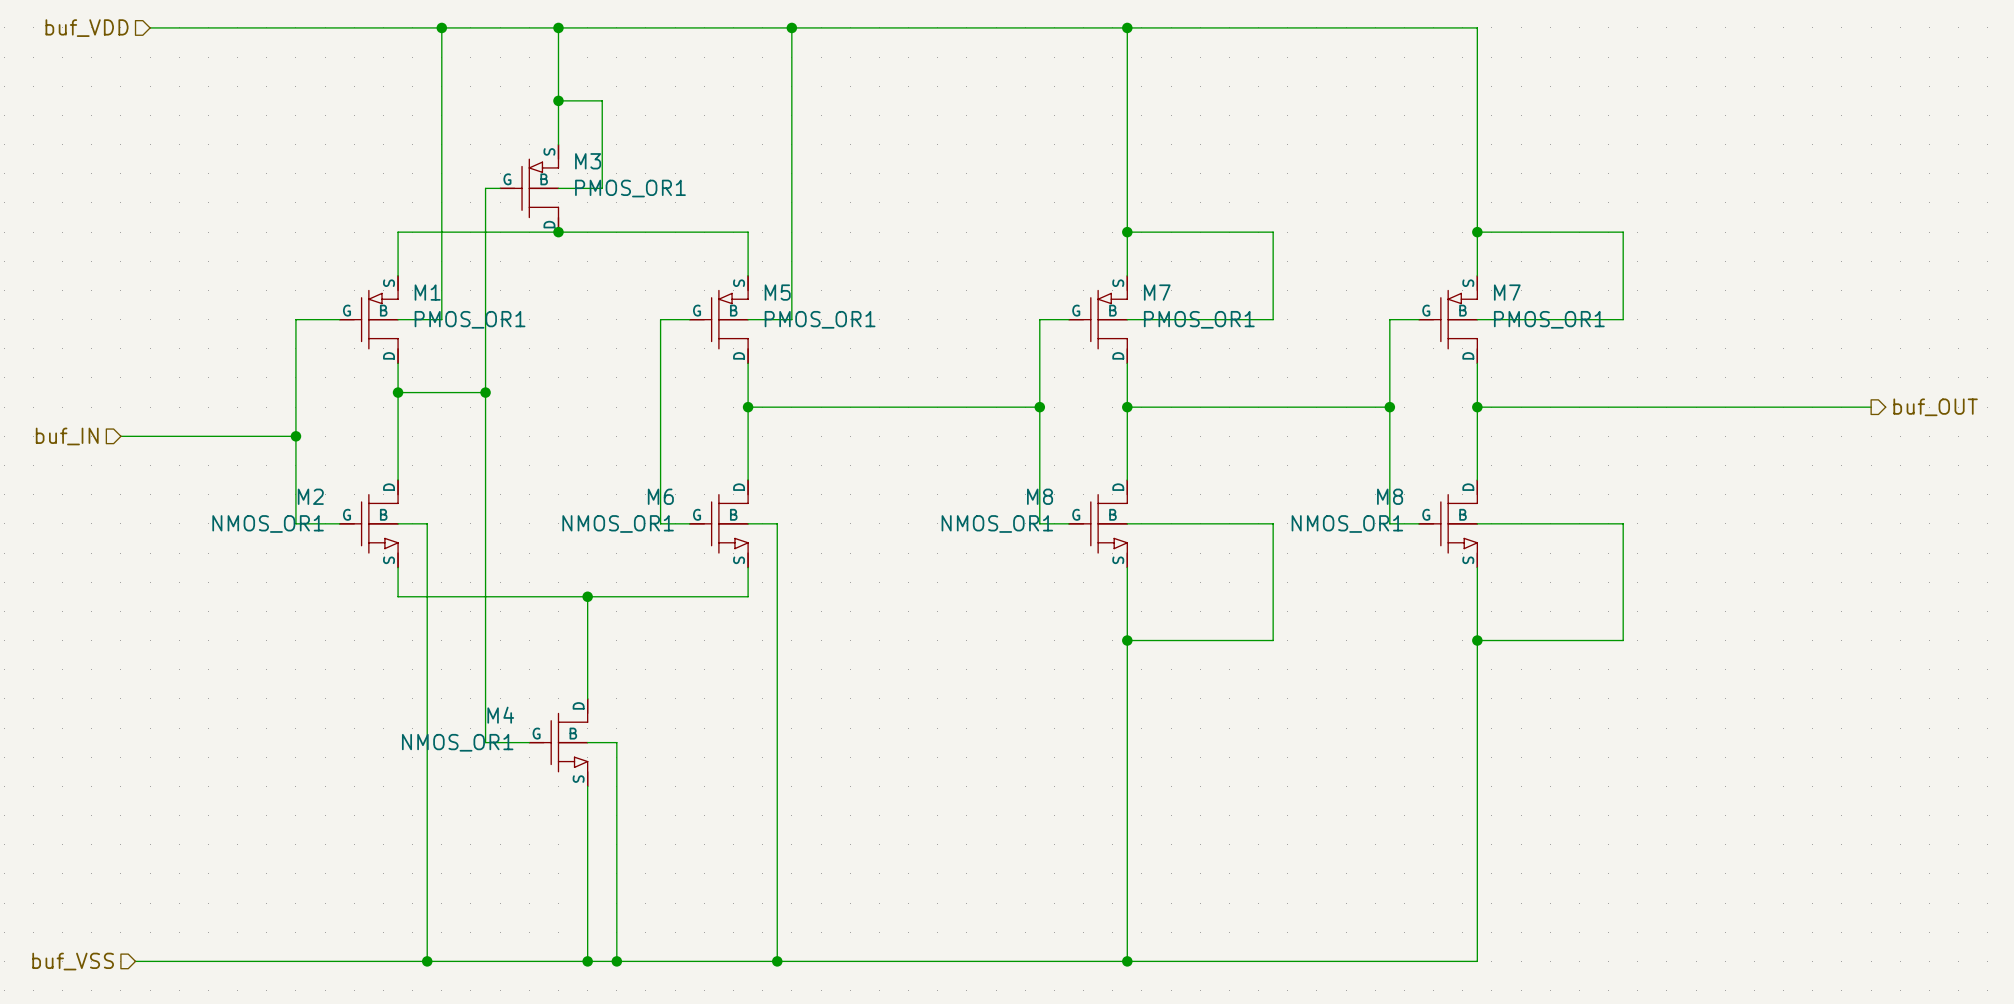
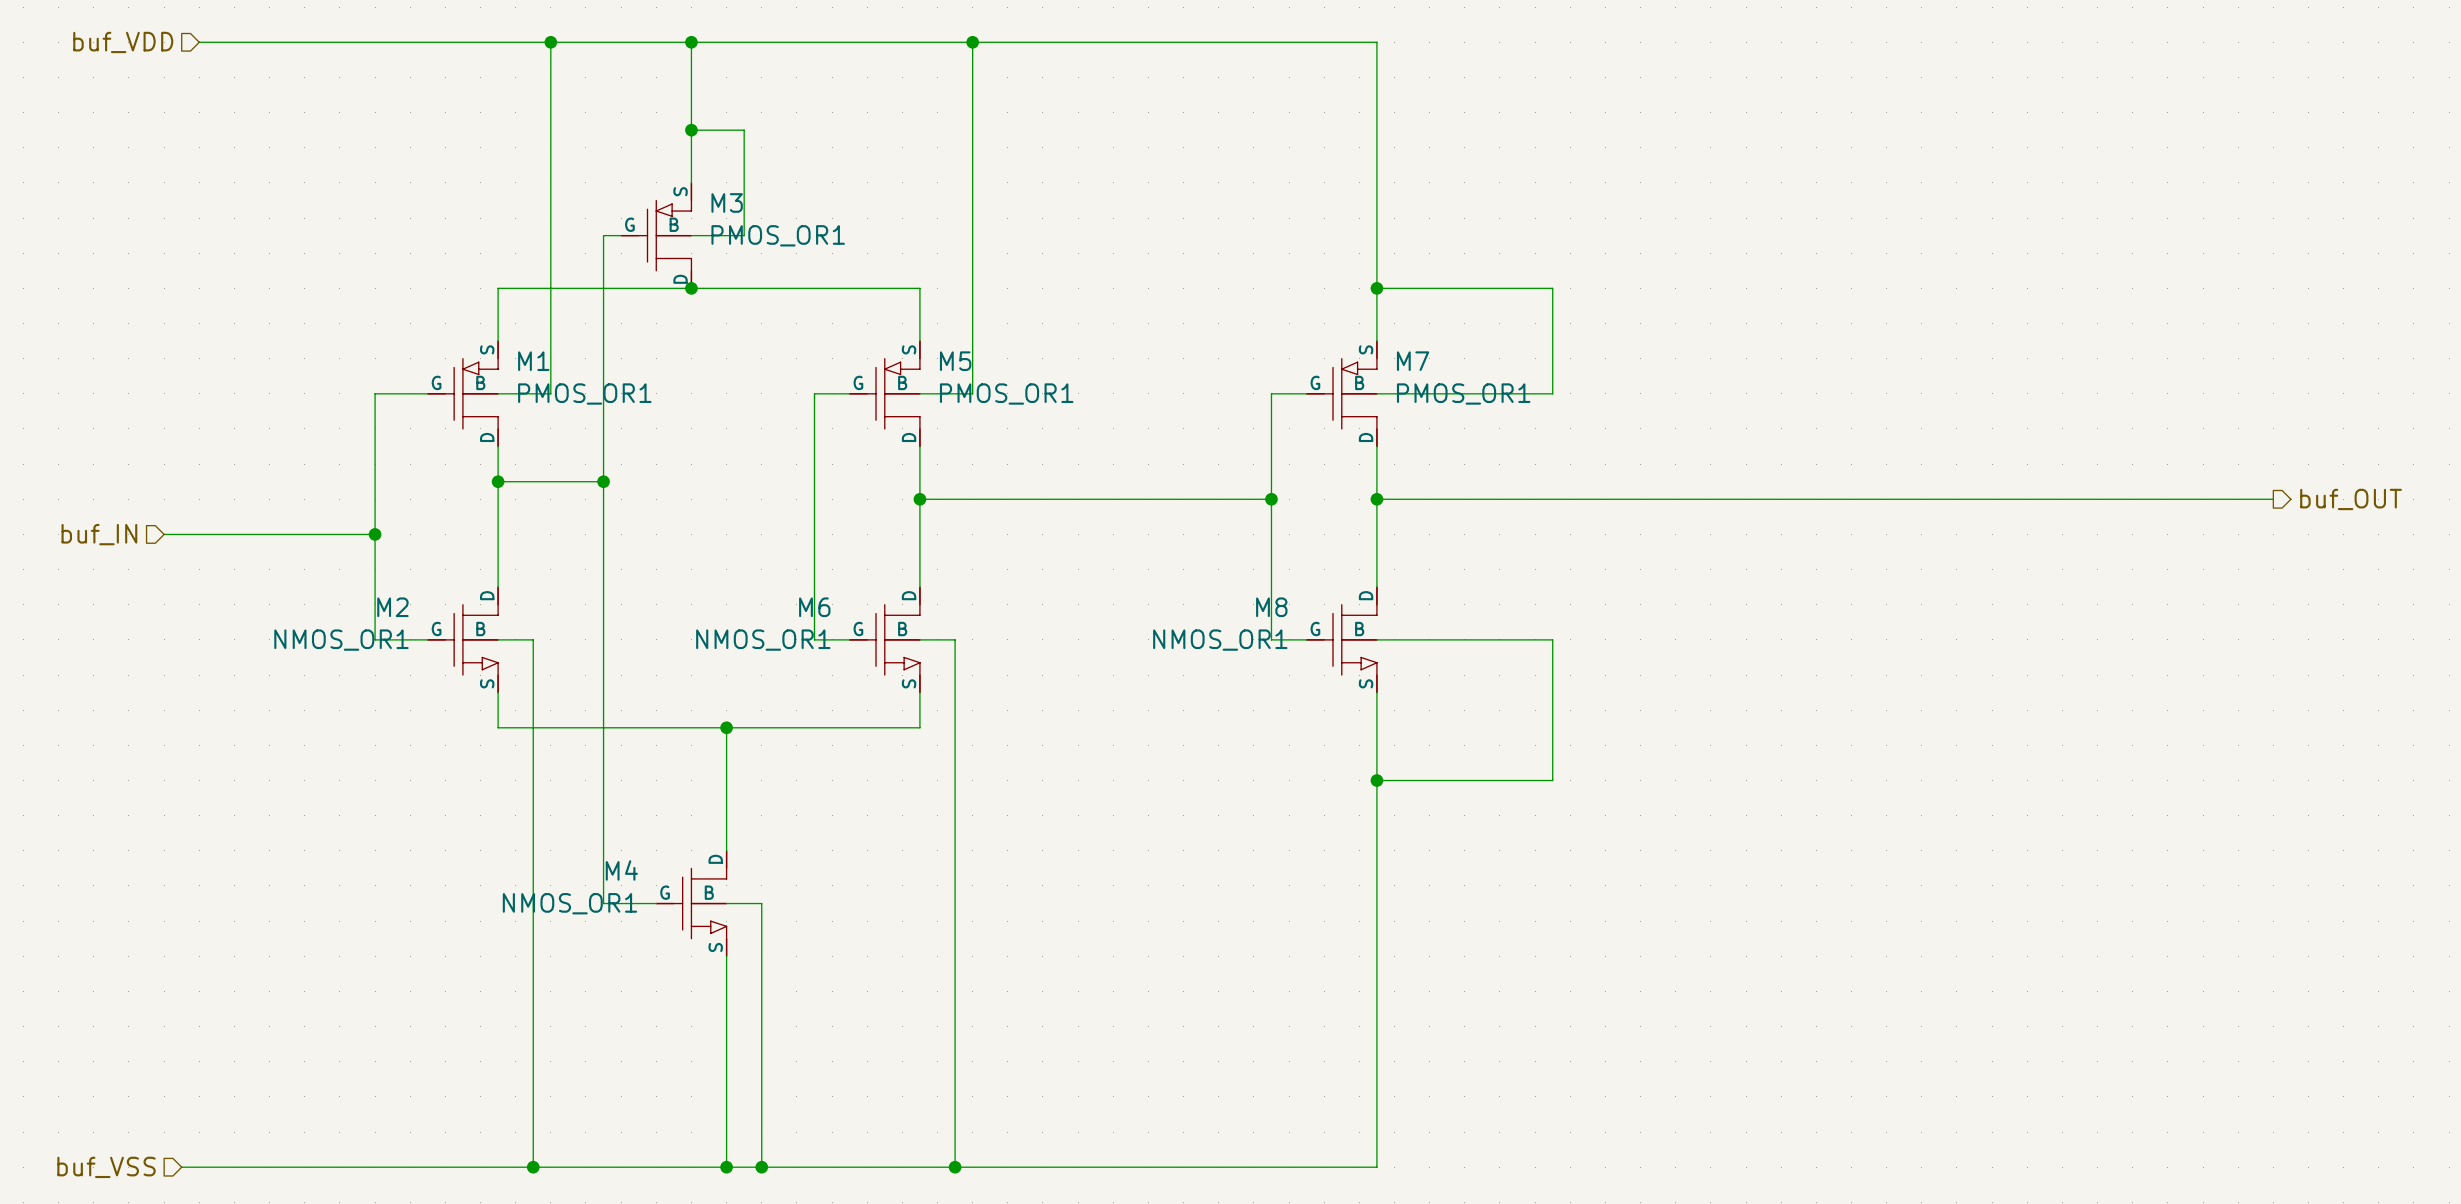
wire: (1127, 27) (1477, 27) (1477, 275) -> none
junction: (1127, 27) -> none
wire: (1477, 232) (1623, 232) (1623, 319) (1477, 319) -> none
junction: (1477, 232) -> none
wire: (1419, 319) (1389, 319) (1389, 523) (1419, 523) -> none
M7: PMOS_OR1 (1448, 319) -> none
wire: (1477, 363) (1477, 480) -> none
wire: none -> (1693, 499) (1798, 499)
junction: (1389, 407) -> none
junction: (1477, 407) -> none
M8: NMOS_OR1 (1448, 523) -> none
wire: (1477, 523) (1623, 523) (1623, 640) (1477, 640) -> none
wire: (1477, 567) (1477, 961) (1127, 961) -> none
junction: (1477, 640) -> none
junction: (1127, 961) -> none

